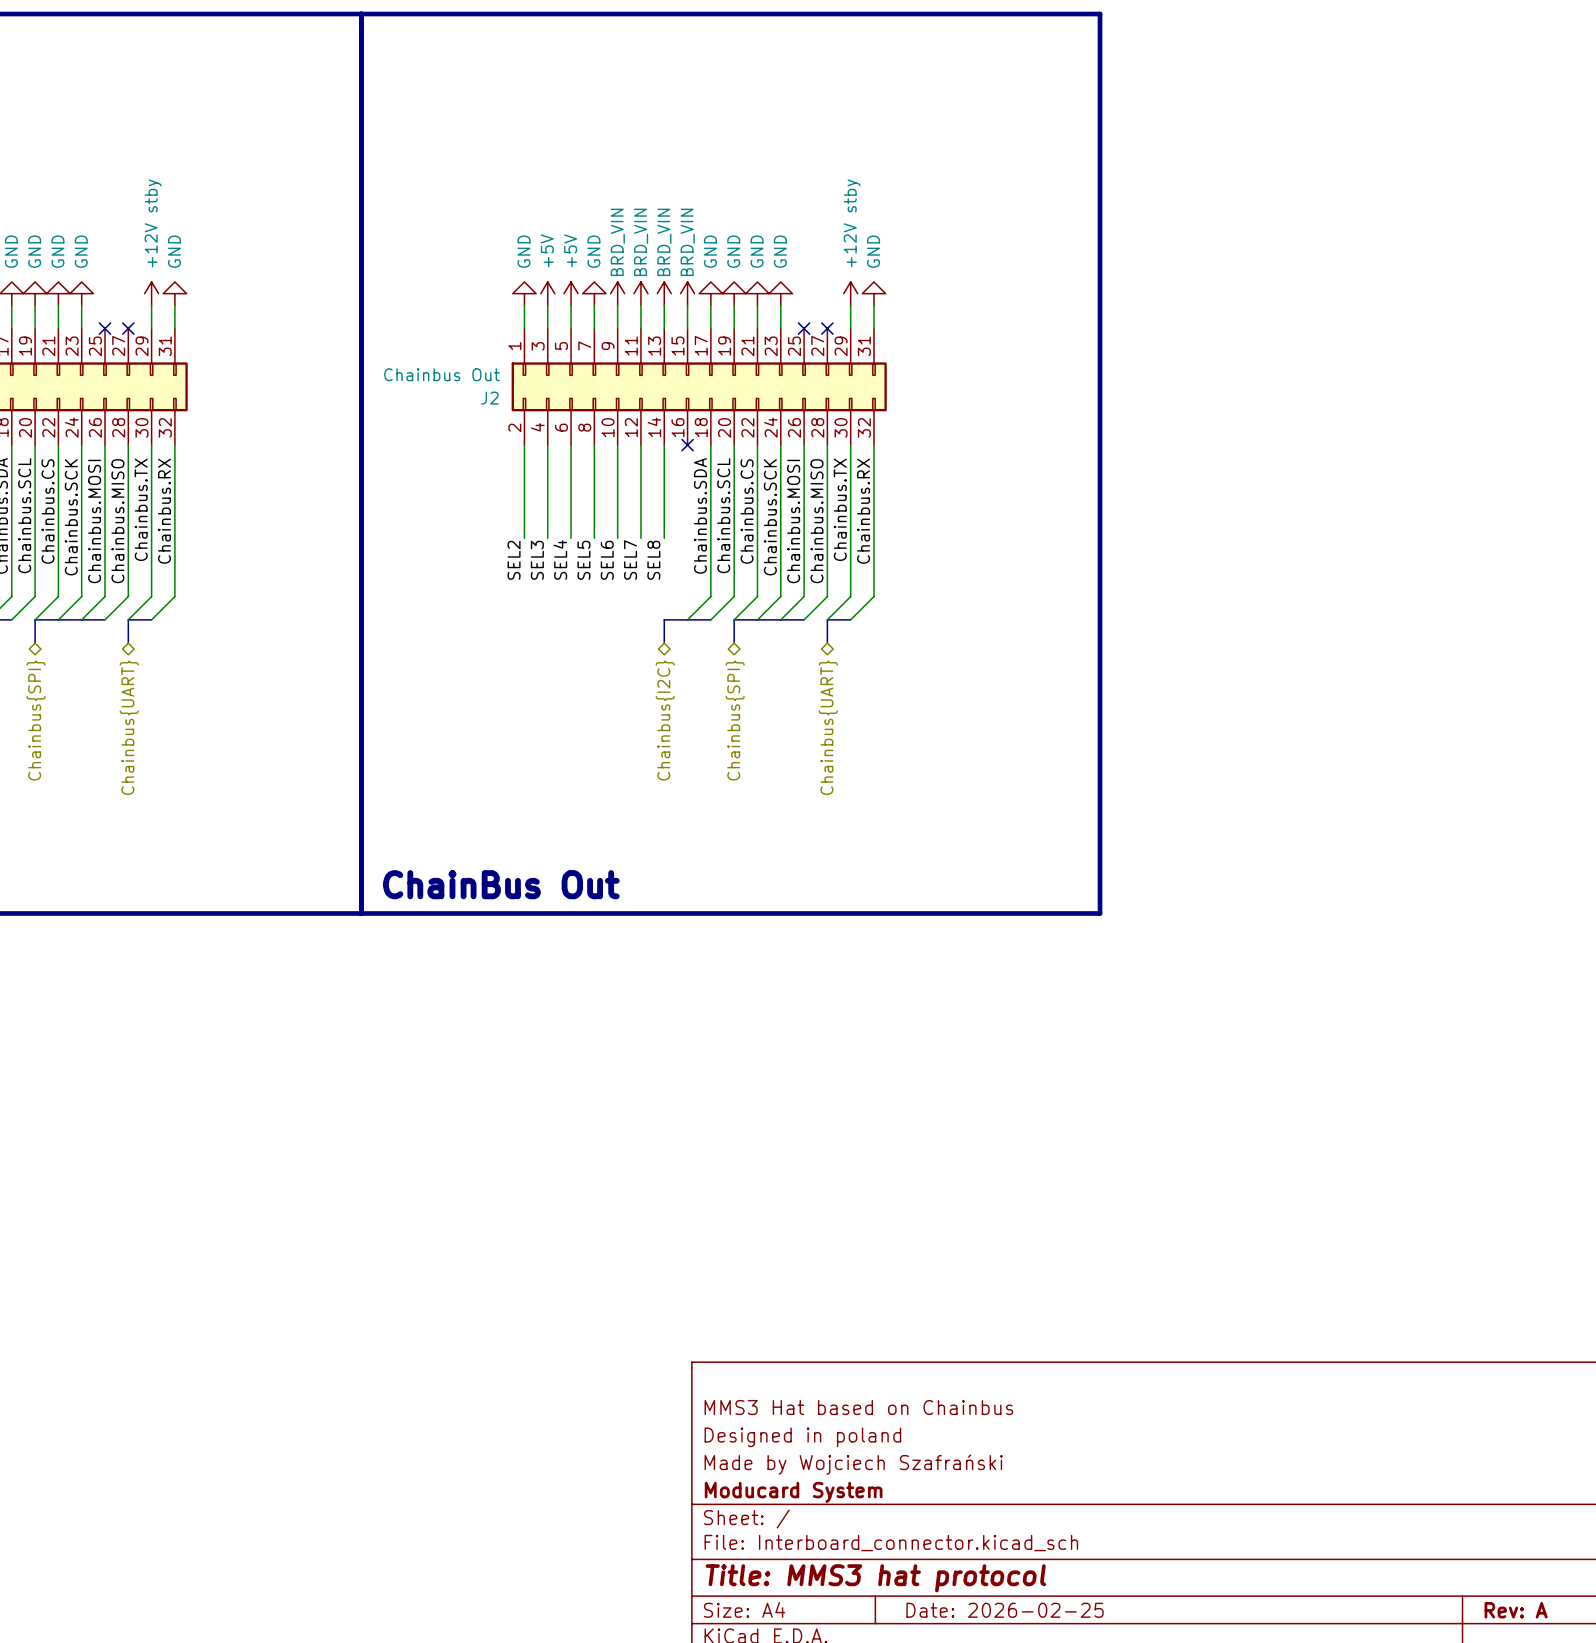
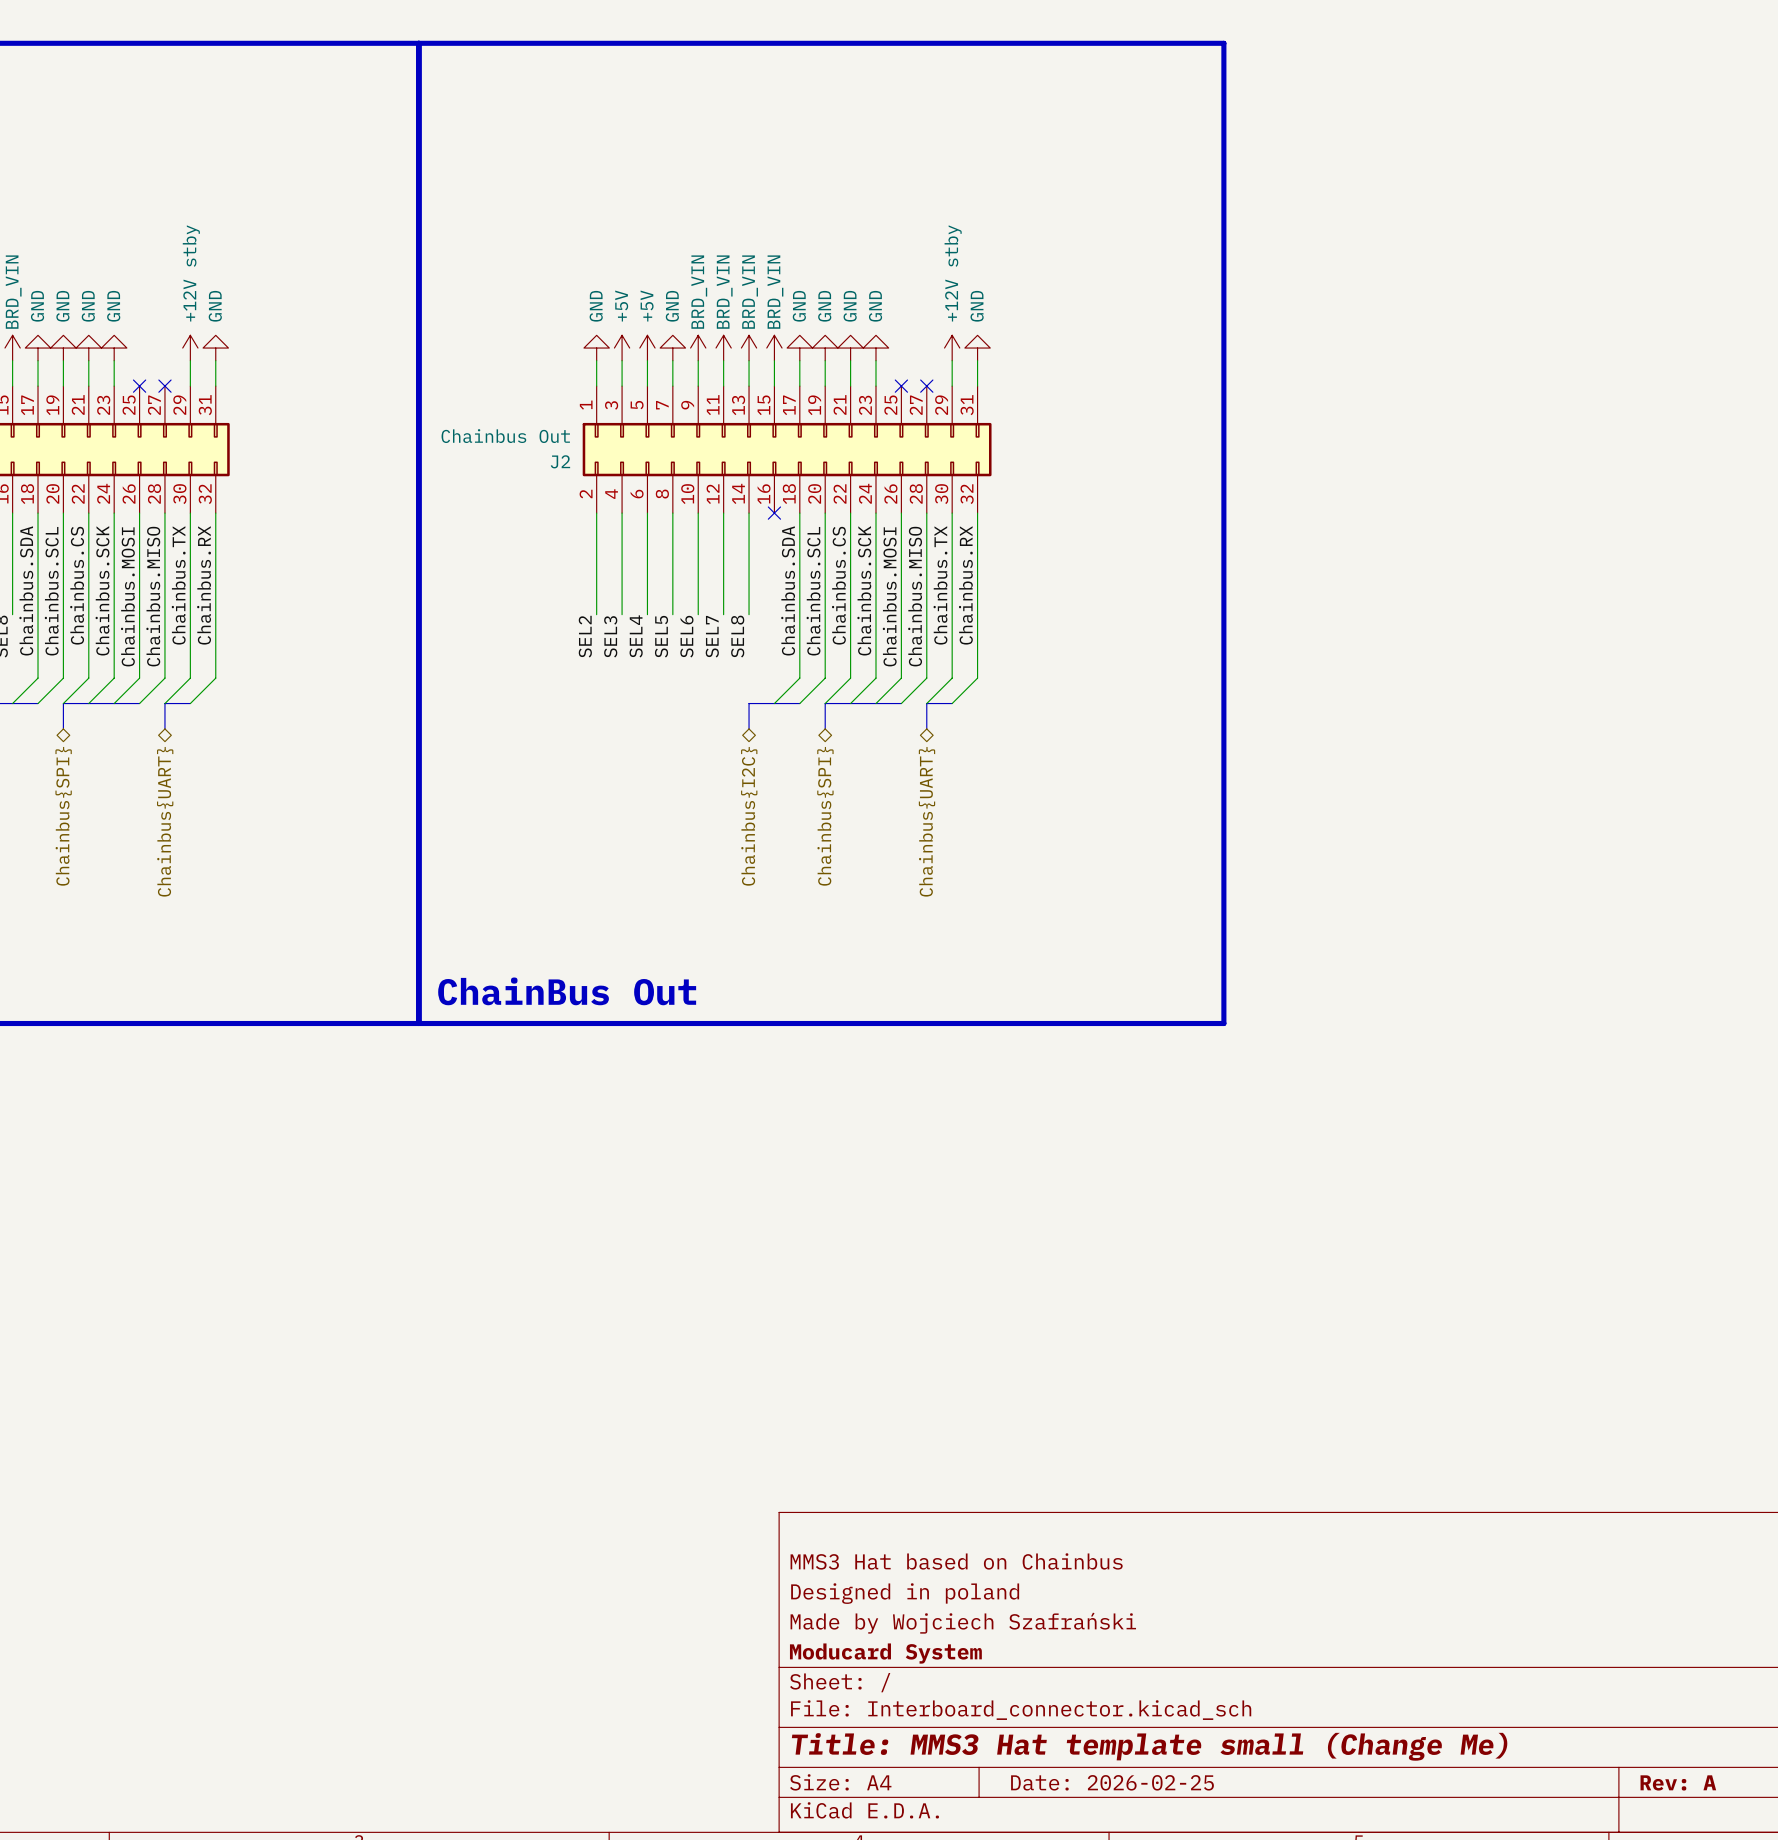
title block: Title: MMS3 hat protocol (875, 1578) -> Title: MMS3 Hat template small (Change Me) (1149, 1746)

